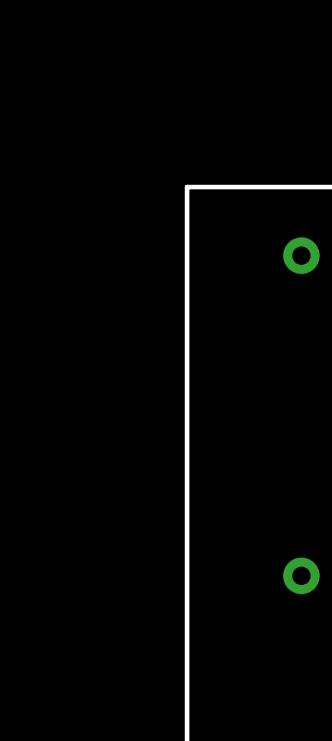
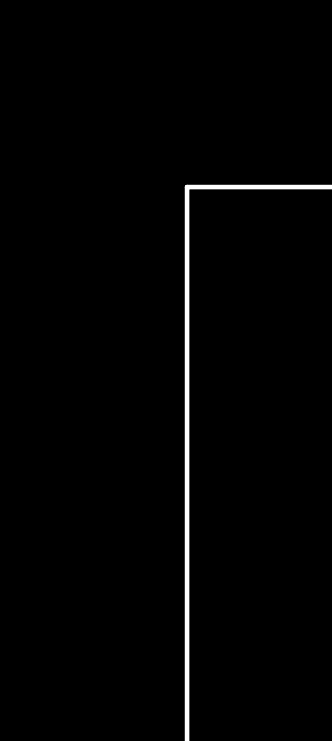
via: (301, 255) -> none
via: (301, 575) -> none

